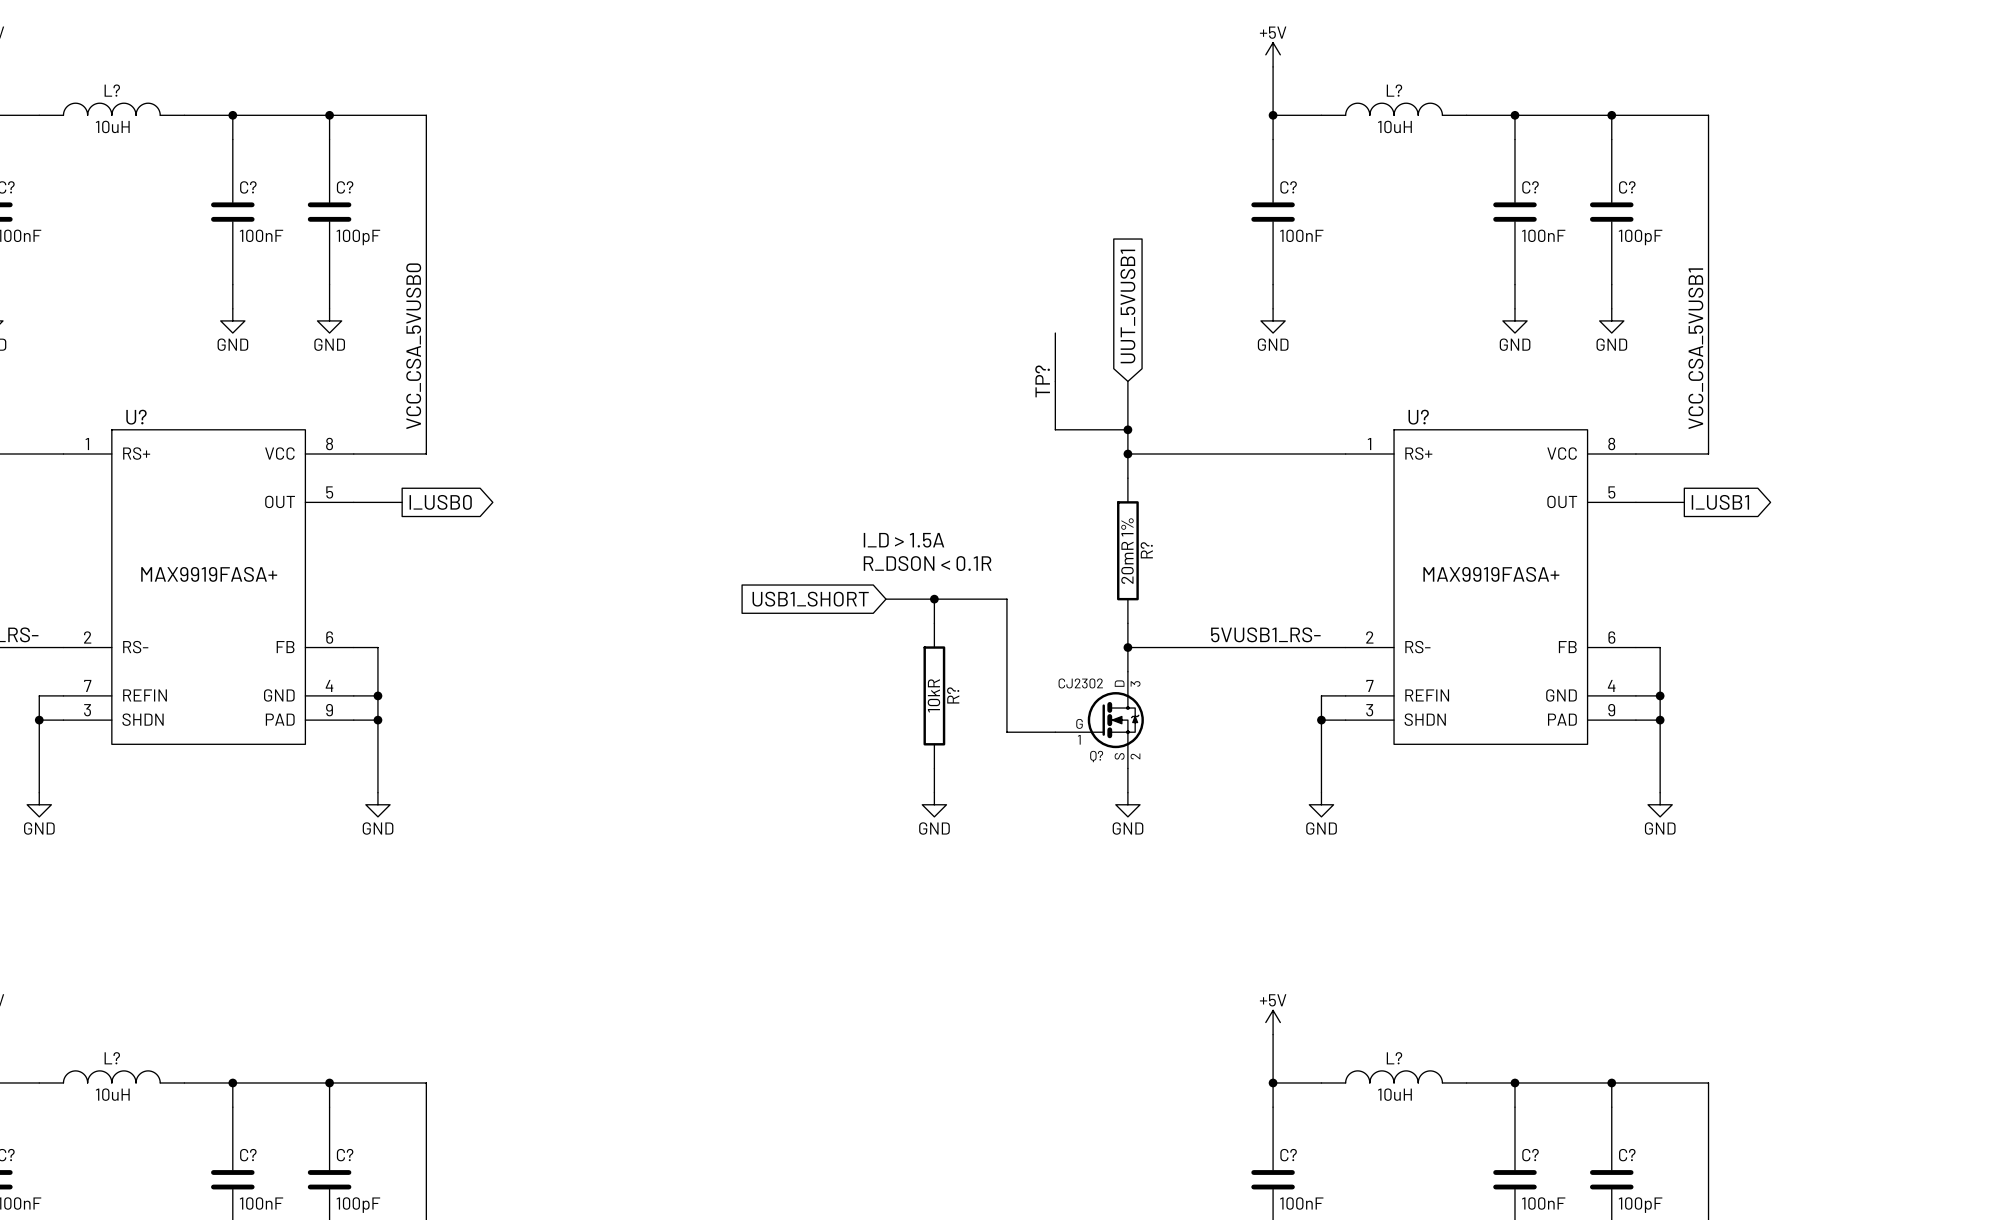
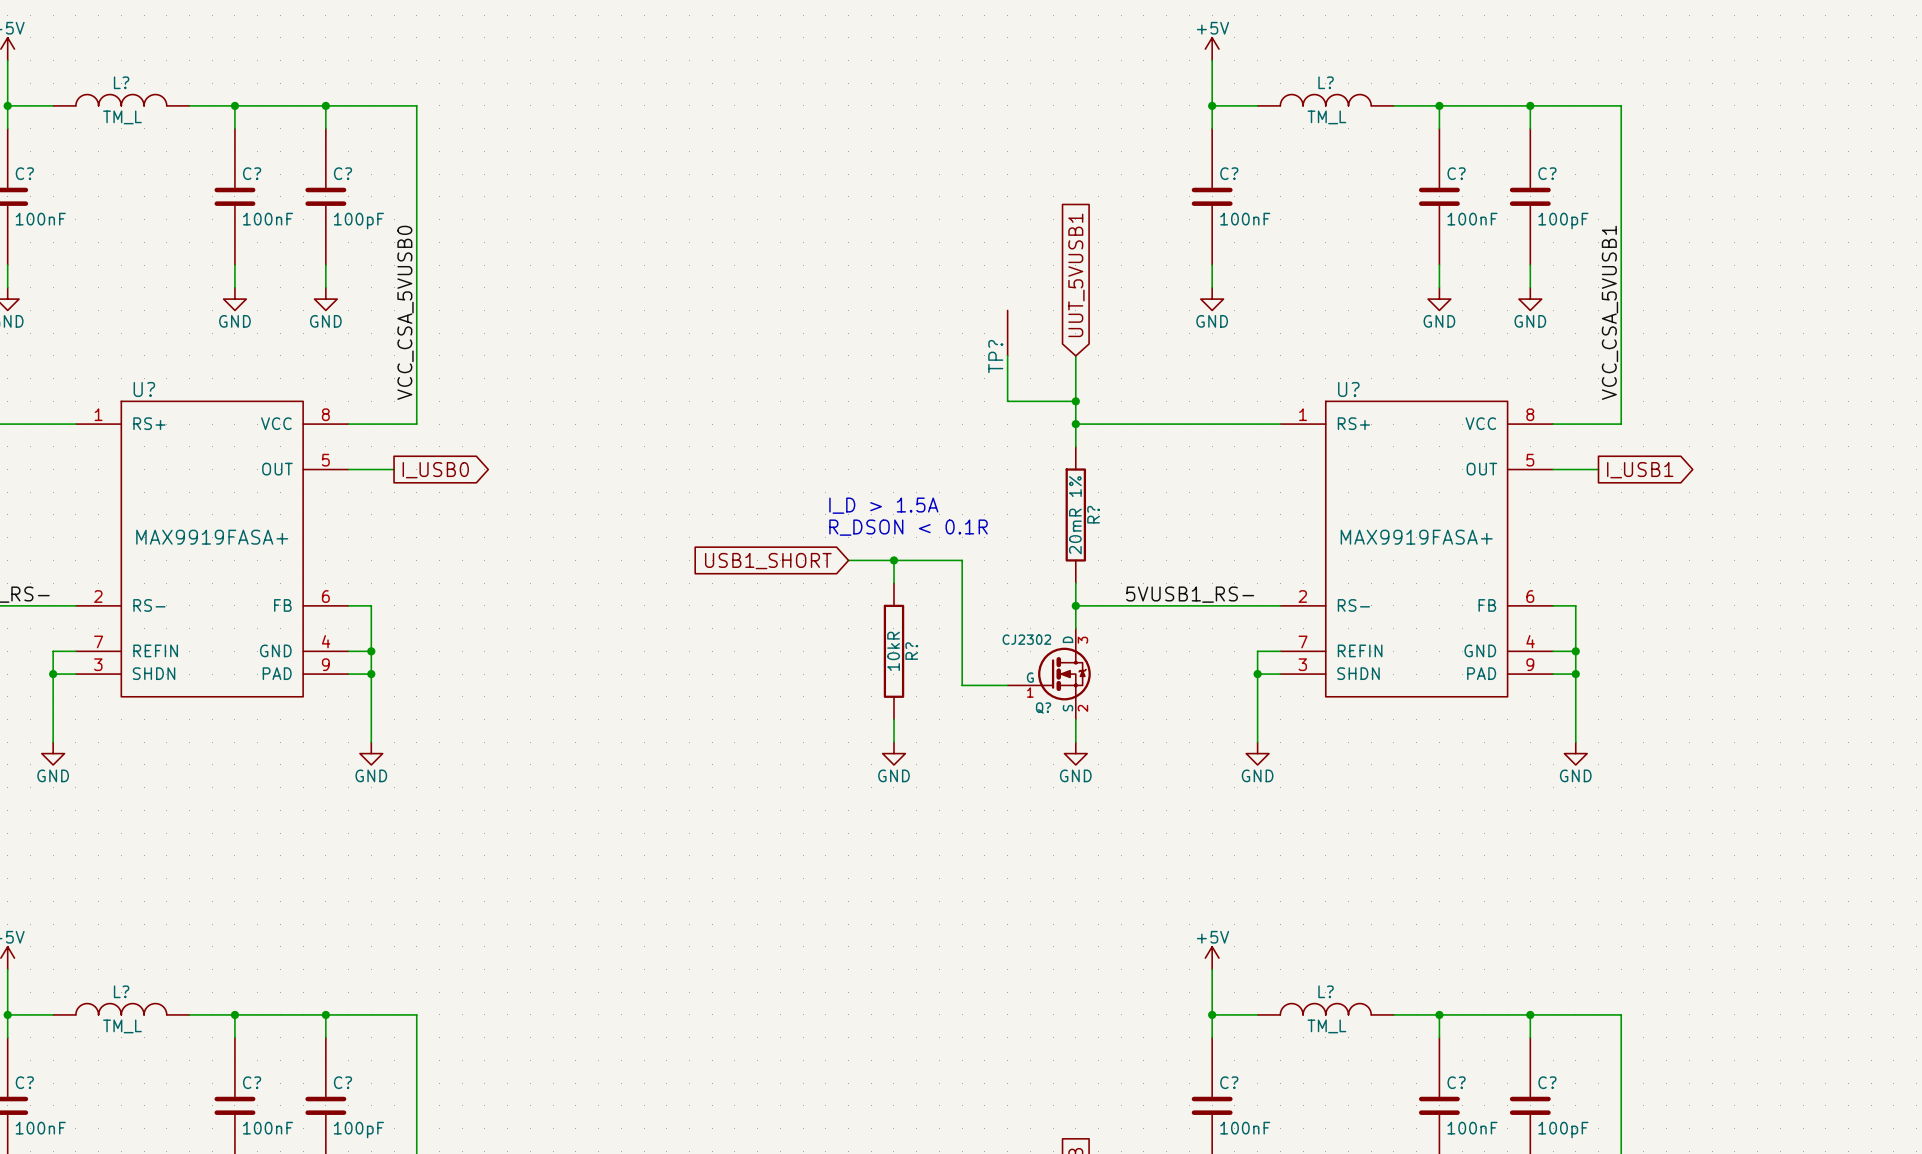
L? value: 10uH (112, 126) -> TM_L (122, 117)
L? value: 10uH (1394, 126) -> TM_L (1326, 117)
L? value: 10uH (112, 1094) -> TM_L (122, 1026)
L? value: 10uH (1394, 1094) -> TM_L (1326, 1026)

